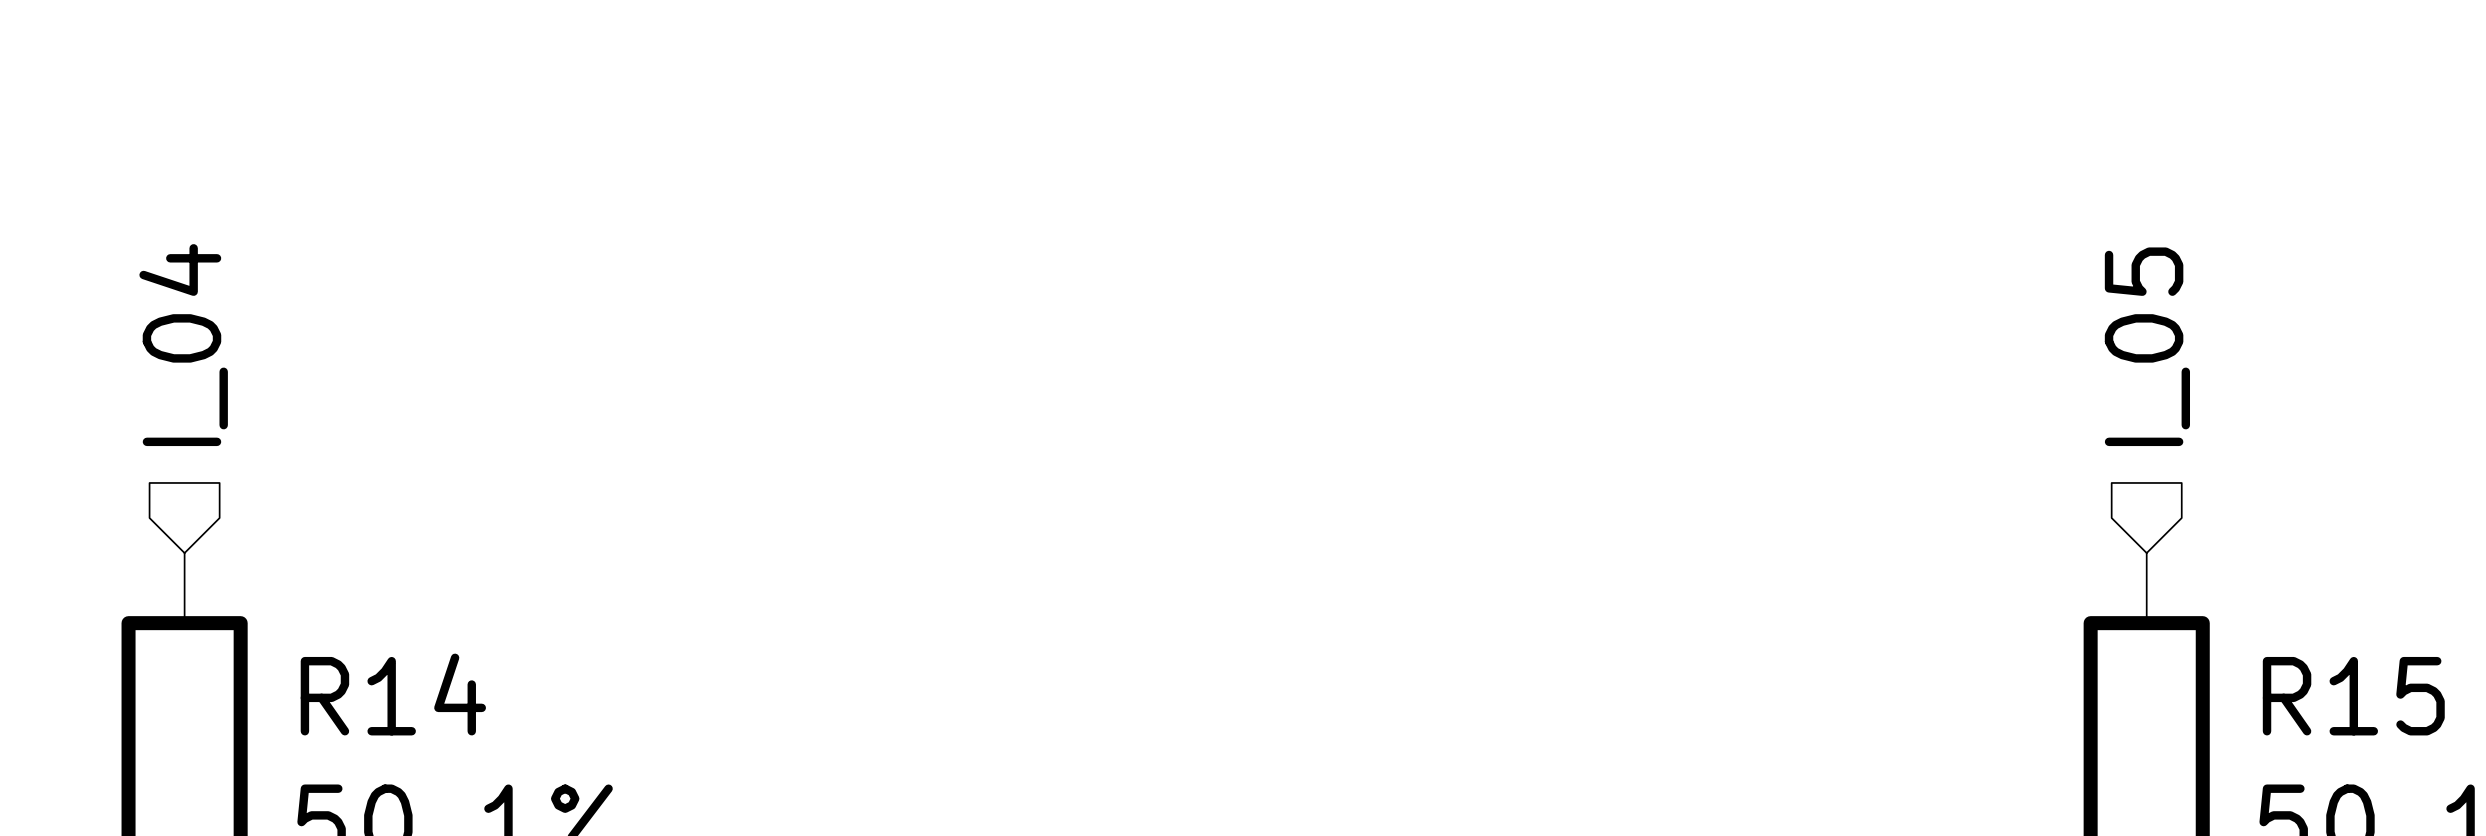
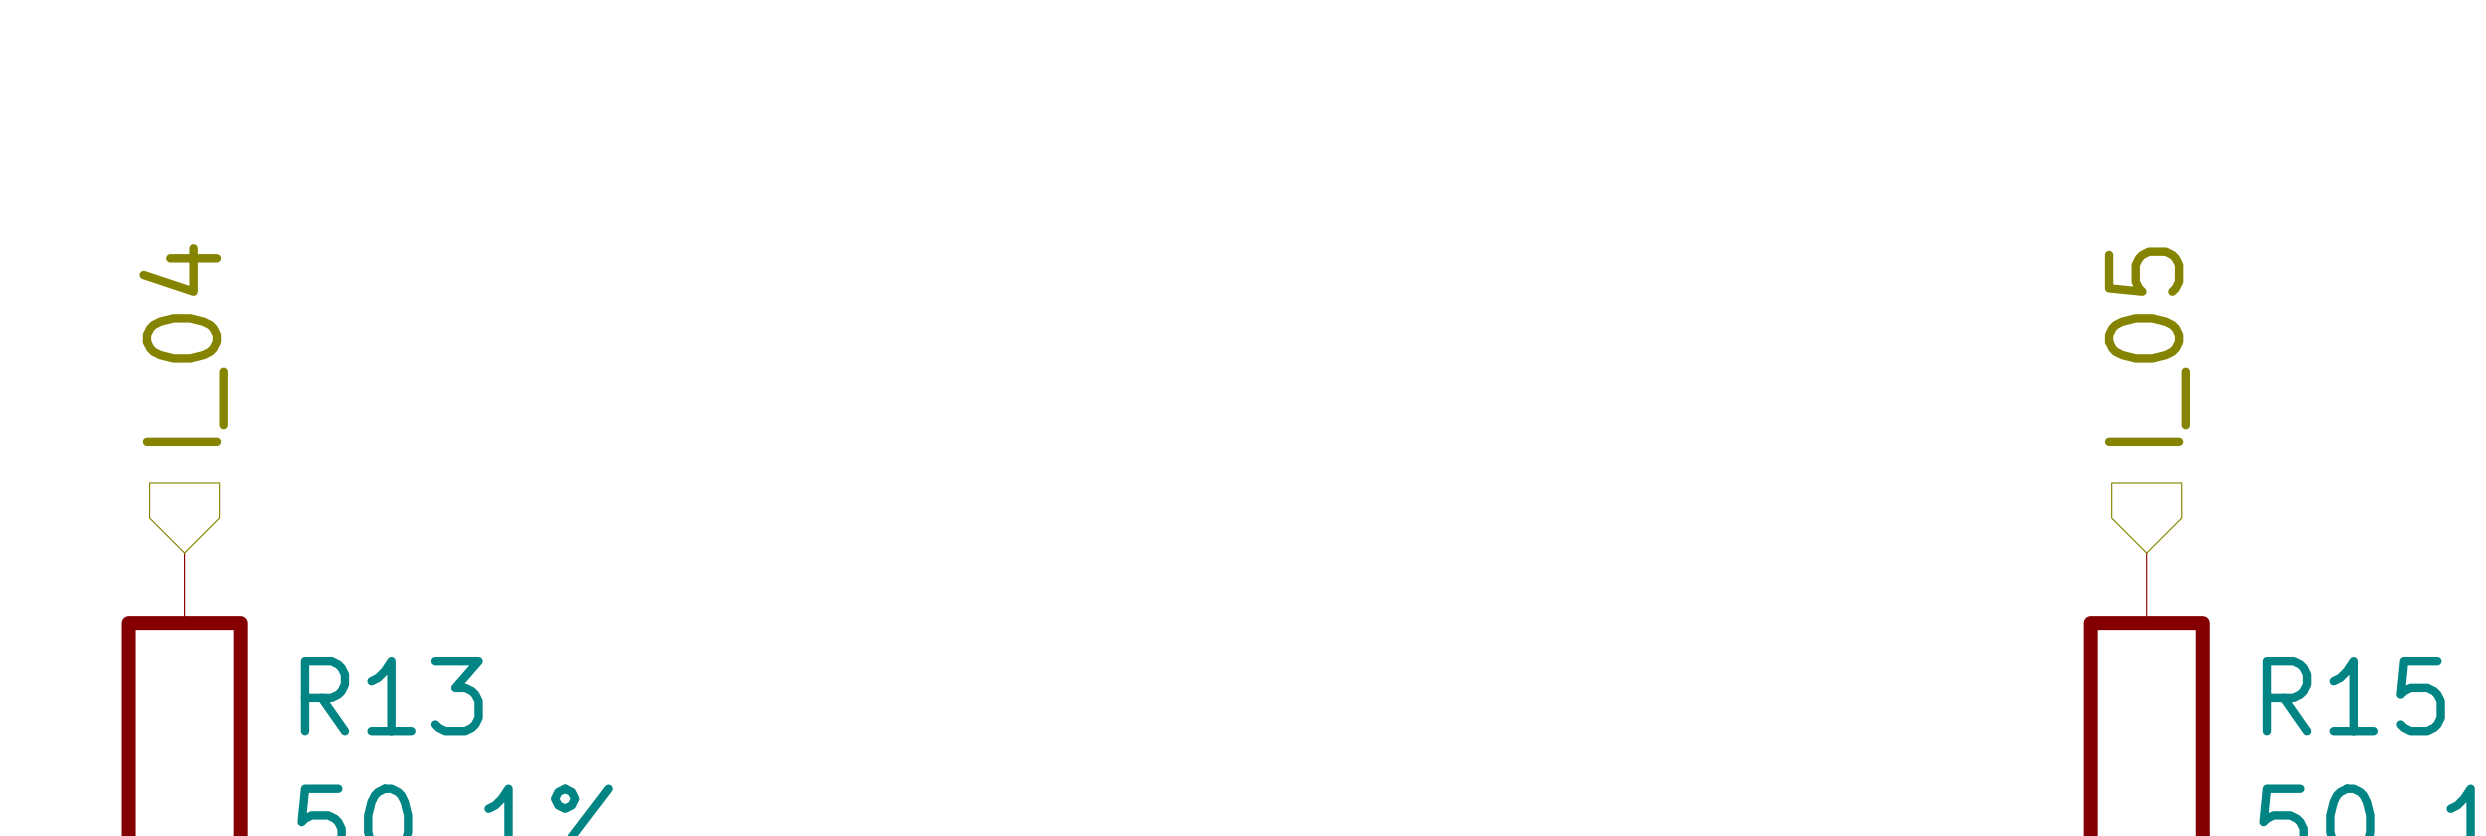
R14 name: R14 (393, 694) -> R13 (391, 696)

